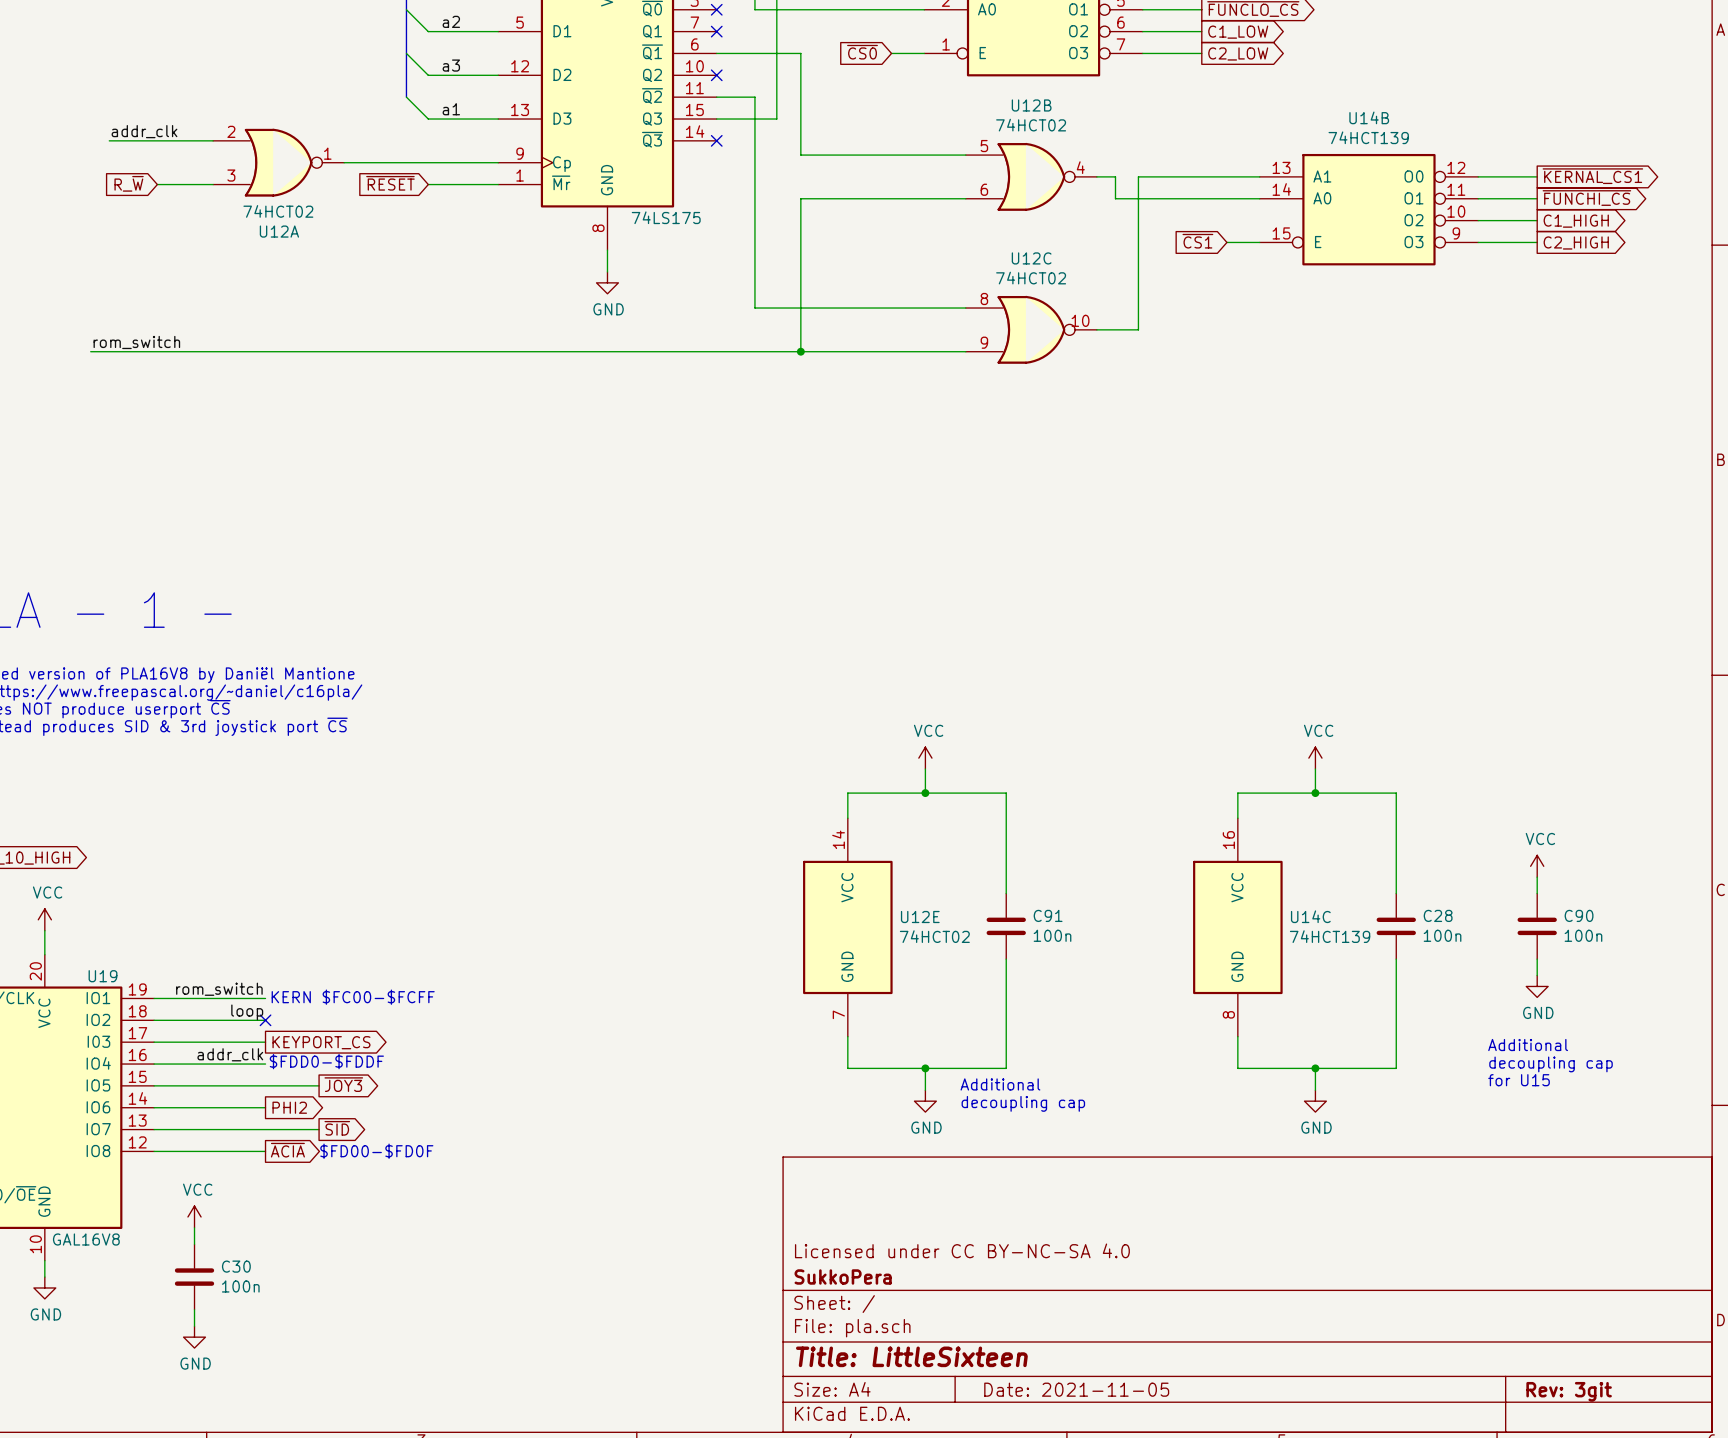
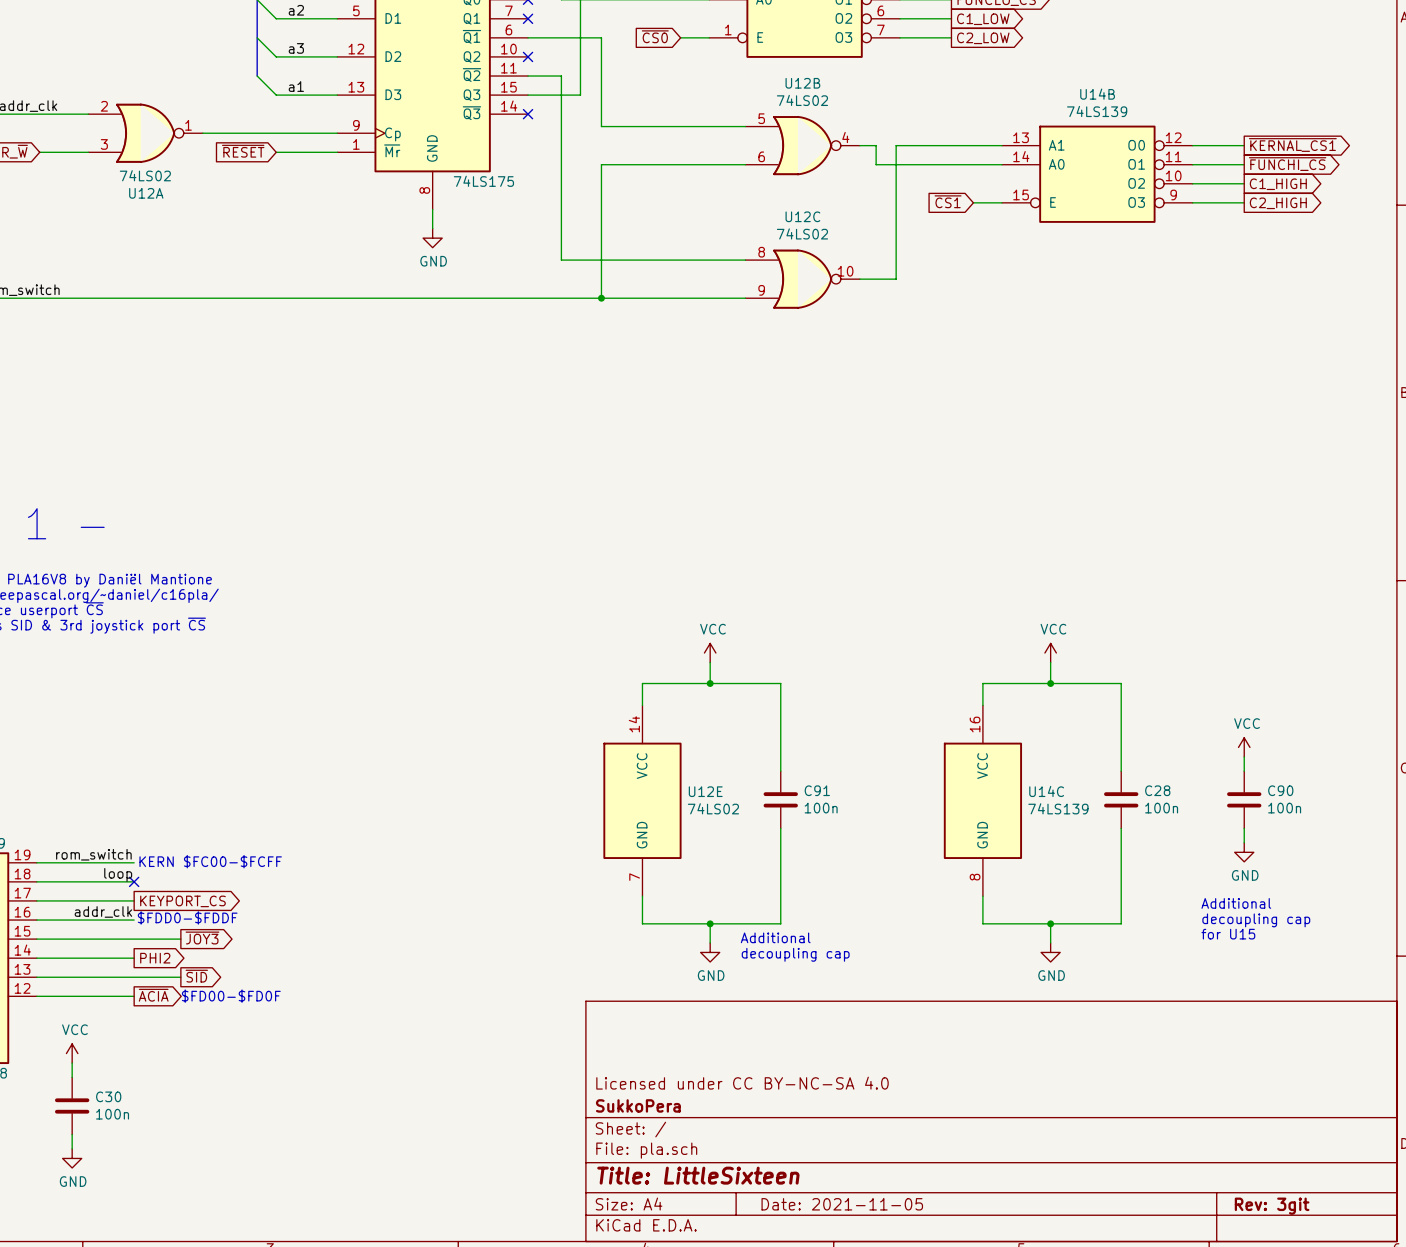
U12B value: 74HCT02 (1031, 125) -> 74LS02 (802, 100)
U14B value: 74HCT139 (1368, 137) -> 74LS139 (1097, 111)
U12A value: 74HCT02 (278, 211) -> 74LS02 (145, 175)
U12C value: 74HCT02 (1031, 278) -> 74LS02 (802, 233)
U12E value: 74HCT02 (934, 936) -> 74LS02 (713, 808)
U14C value: 74HCT139 (1330, 936) -> 74LS139 (1058, 808)

